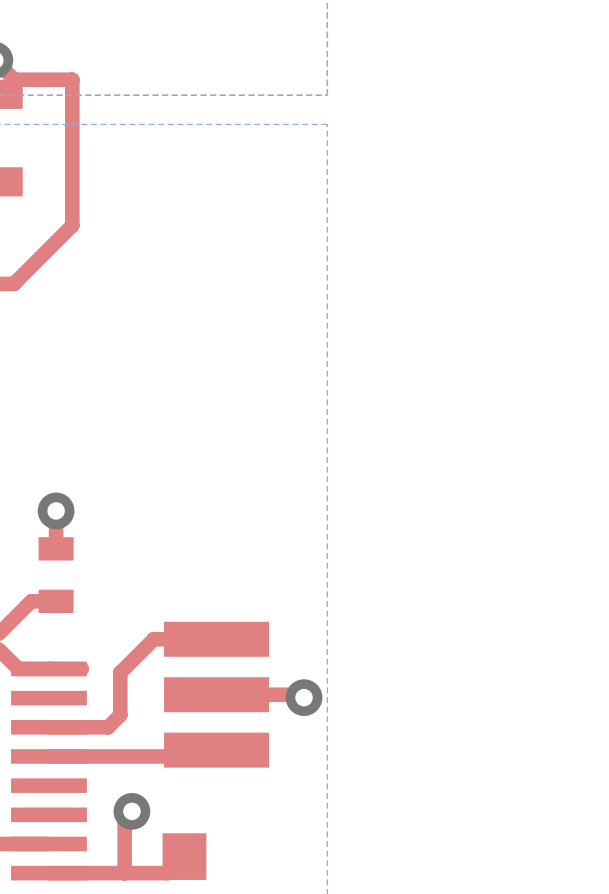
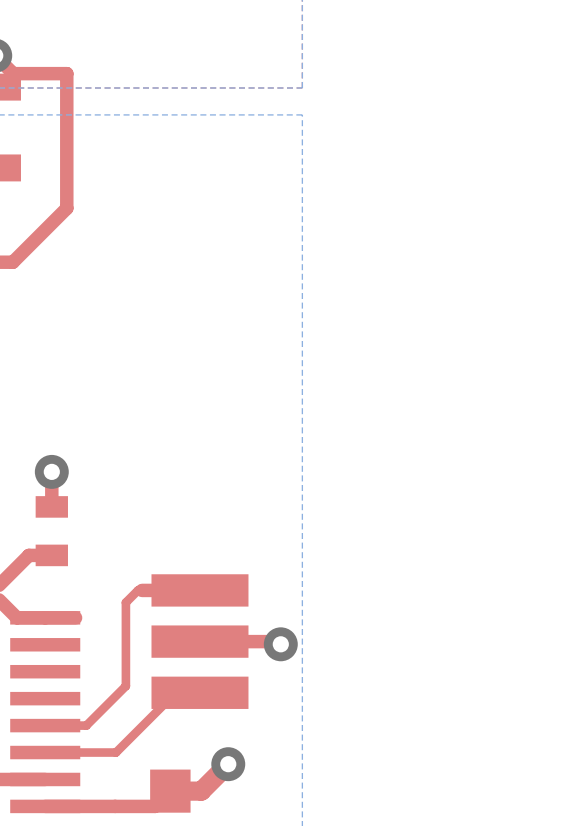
top track: (153, 639) (120, 672) (120, 715) (108, 727) (48, 727) -> (142, 590) (138, 590) (125, 602) (125, 686) (86, 725) (45, 725)
top track: none -> (199, 692) (175, 692) (116, 752) (45, 752)
top track: (210, 756) (48, 756) -> none
top track: (131, 811) (124, 818) (124, 873) -> none
via position: (131, 811) -> (228, 764)
top track: none -> (228, 764) (201, 791) (170, 791)

